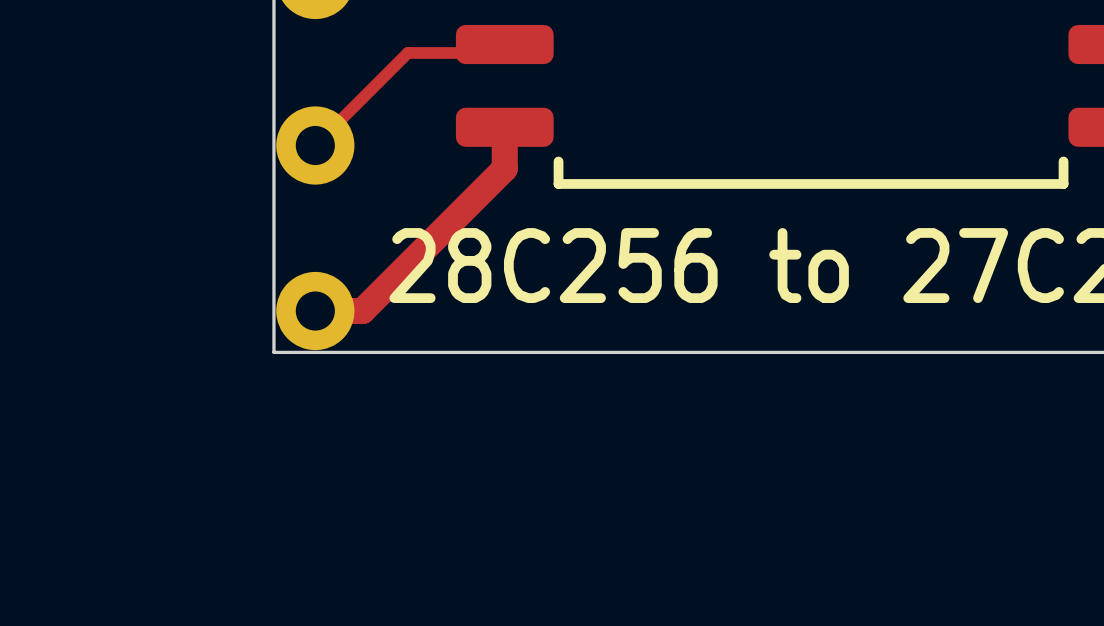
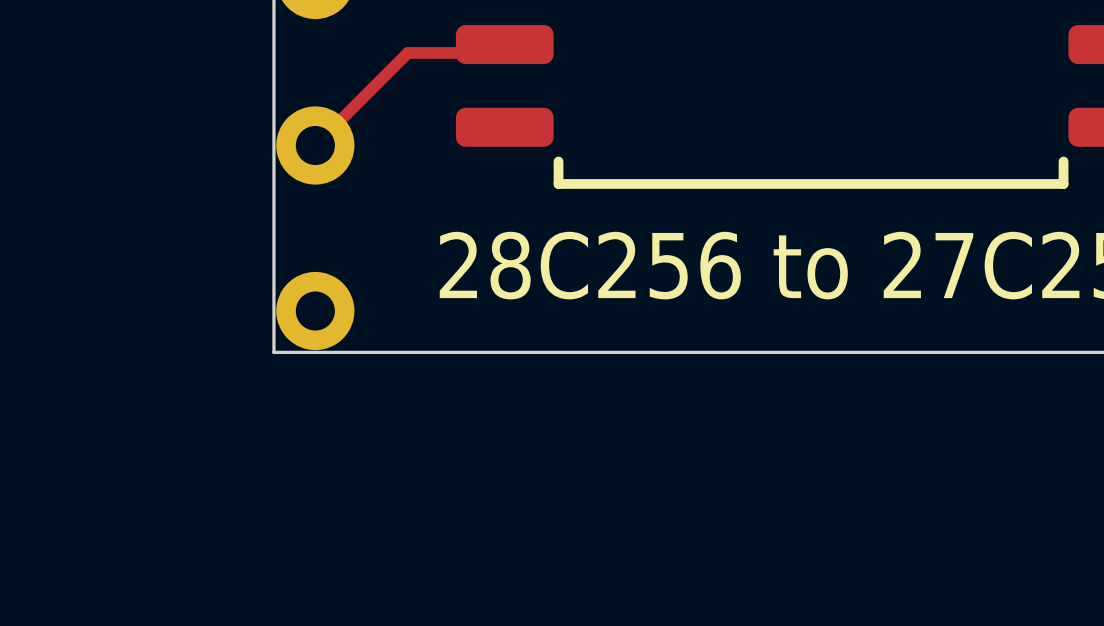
top track: (504, 127) (504, 168) (362, 311) (315, 311) -> none

